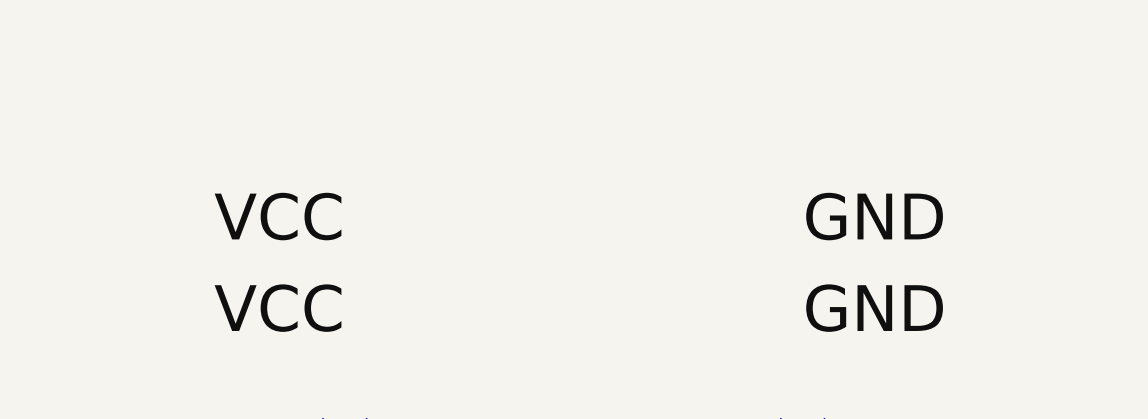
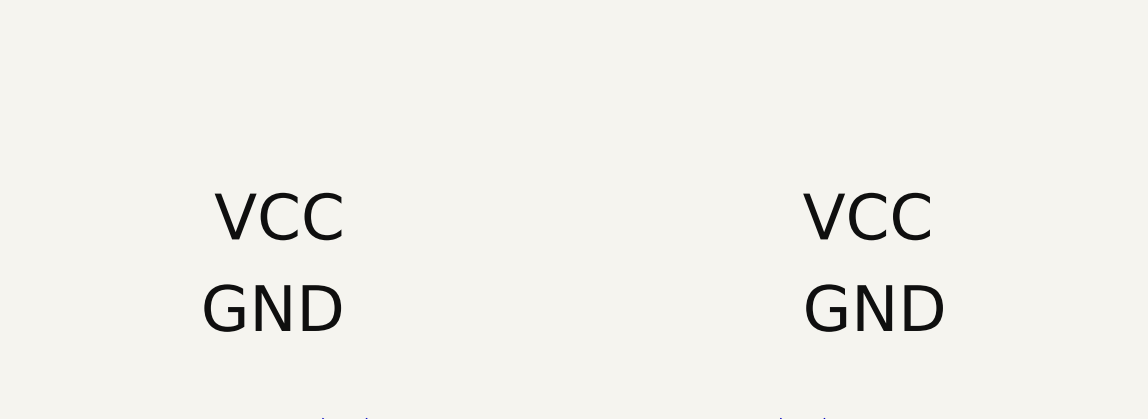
label: GND (874, 216) -> VCC (866, 216)
label: VCC (278, 308) -> GND (272, 308)

